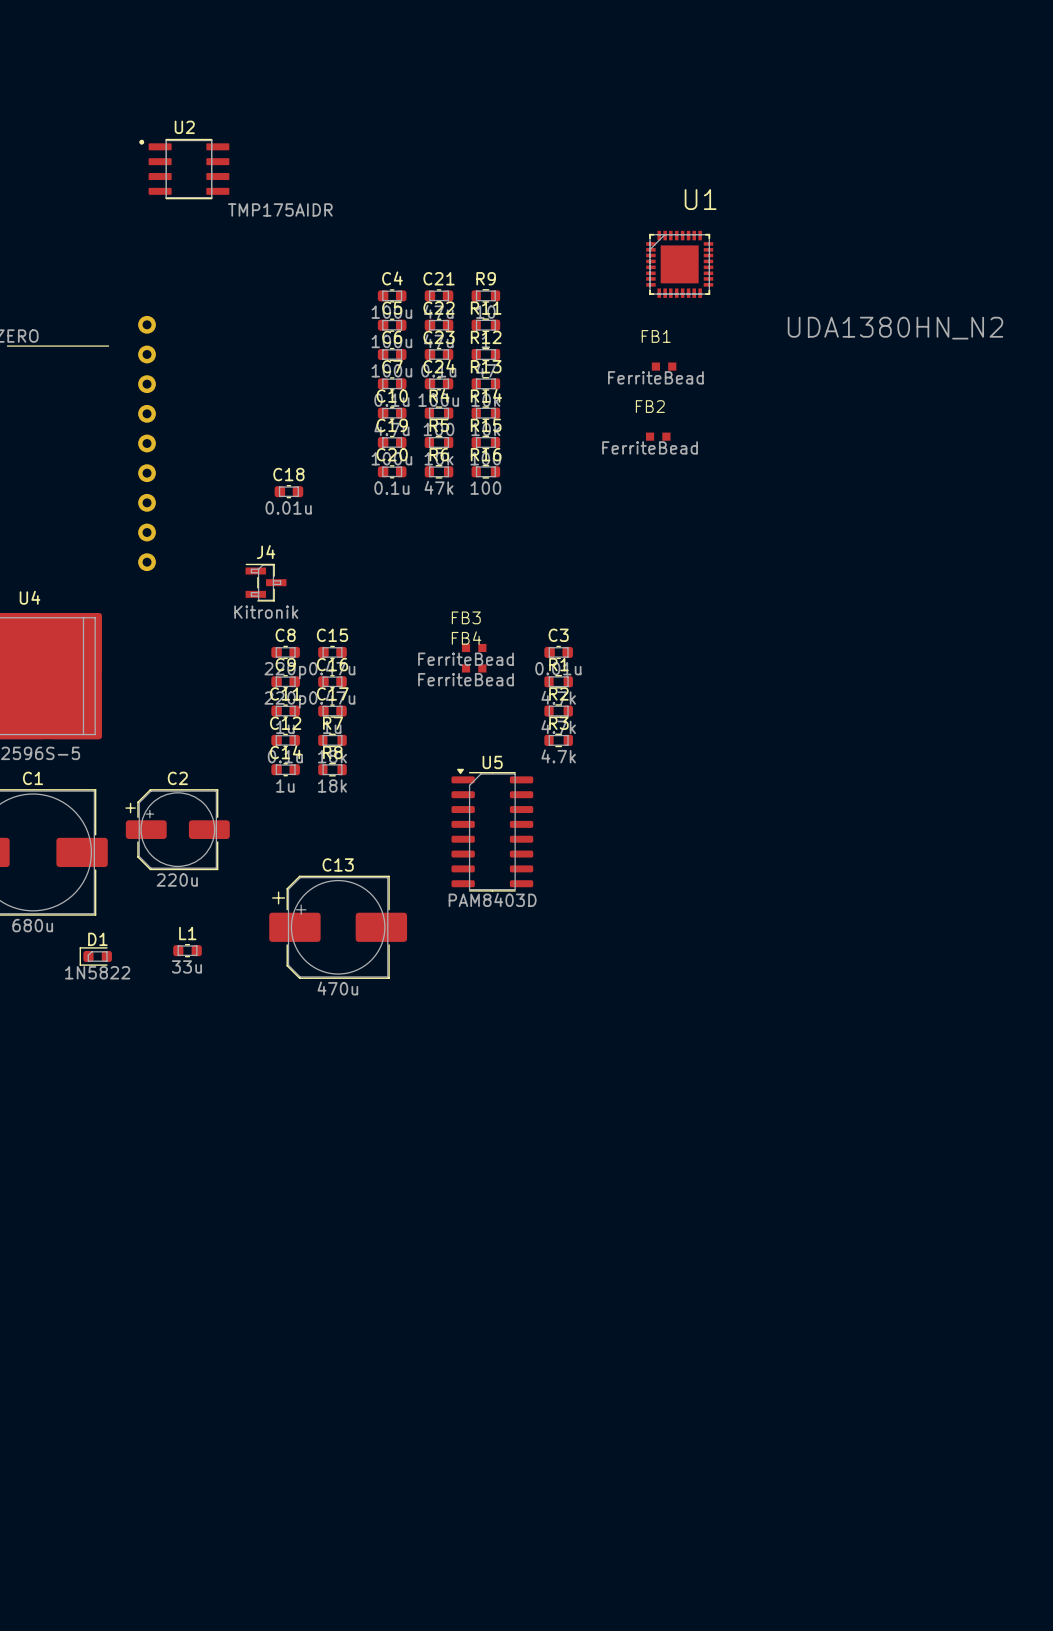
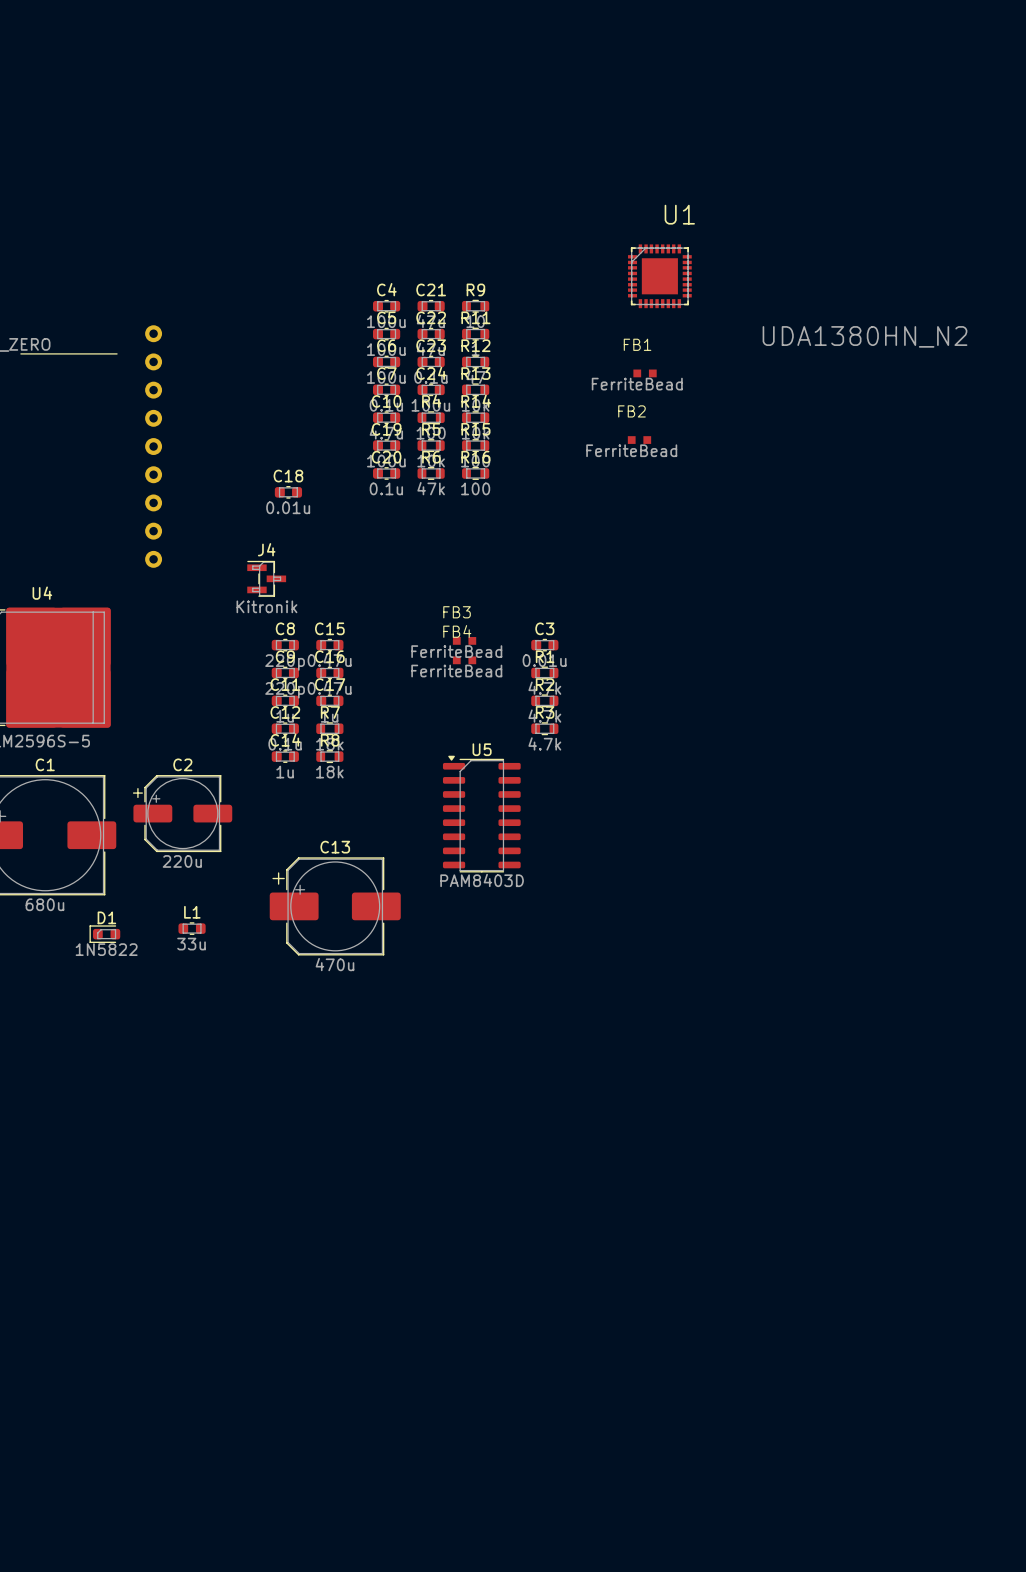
U2: TMP175AIDR (184, 169) -> none

